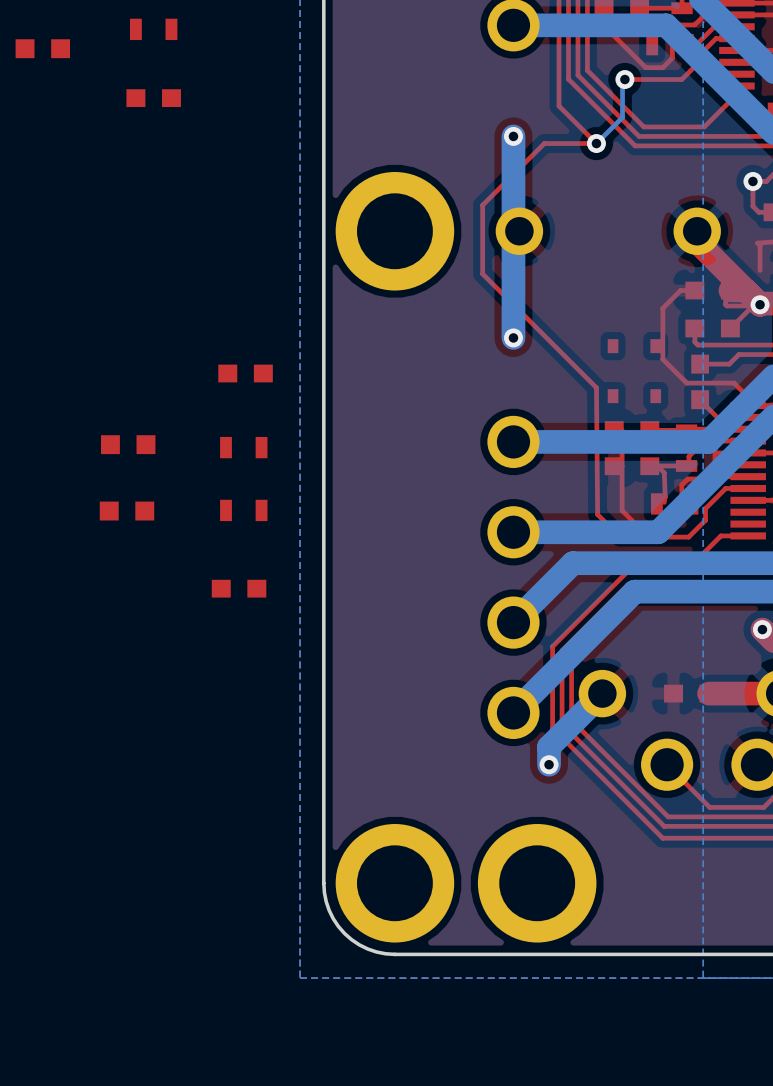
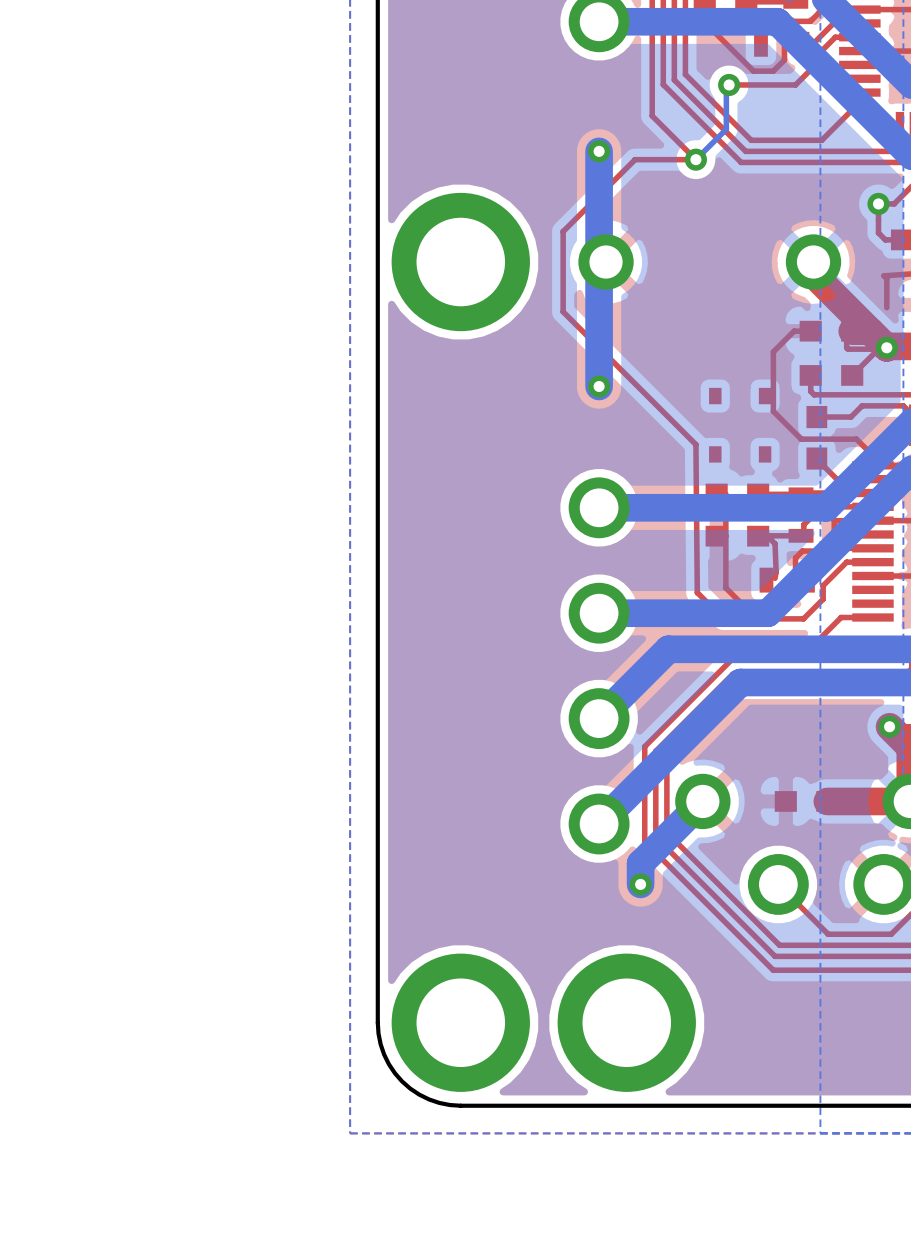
part: (153, 29) -> none
part: (42, 48) -> none
part: (153, 98) -> none
part: (245, 373) -> none
part: (128, 444) -> none
part: (243, 447) -> none
part: (243, 510) -> none
part: (127, 511) -> none
part: (239, 588) -> none

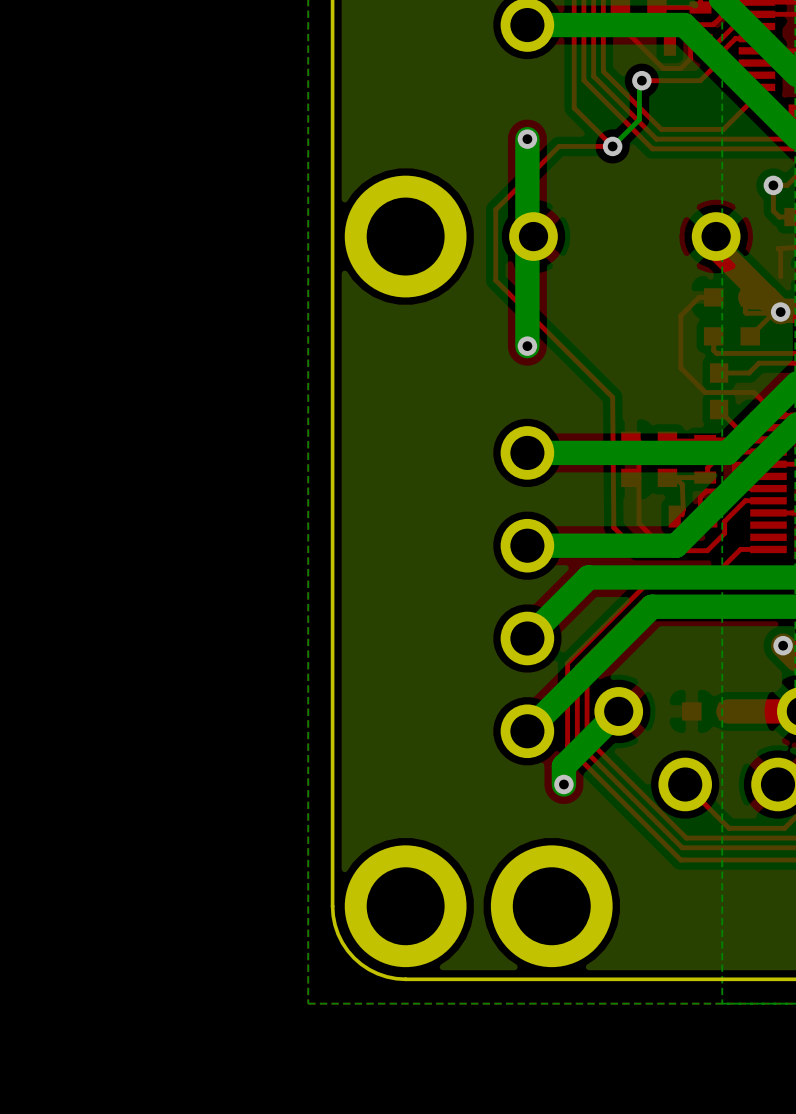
part: (715, 425) -> none
part: (765, 425) -> none

